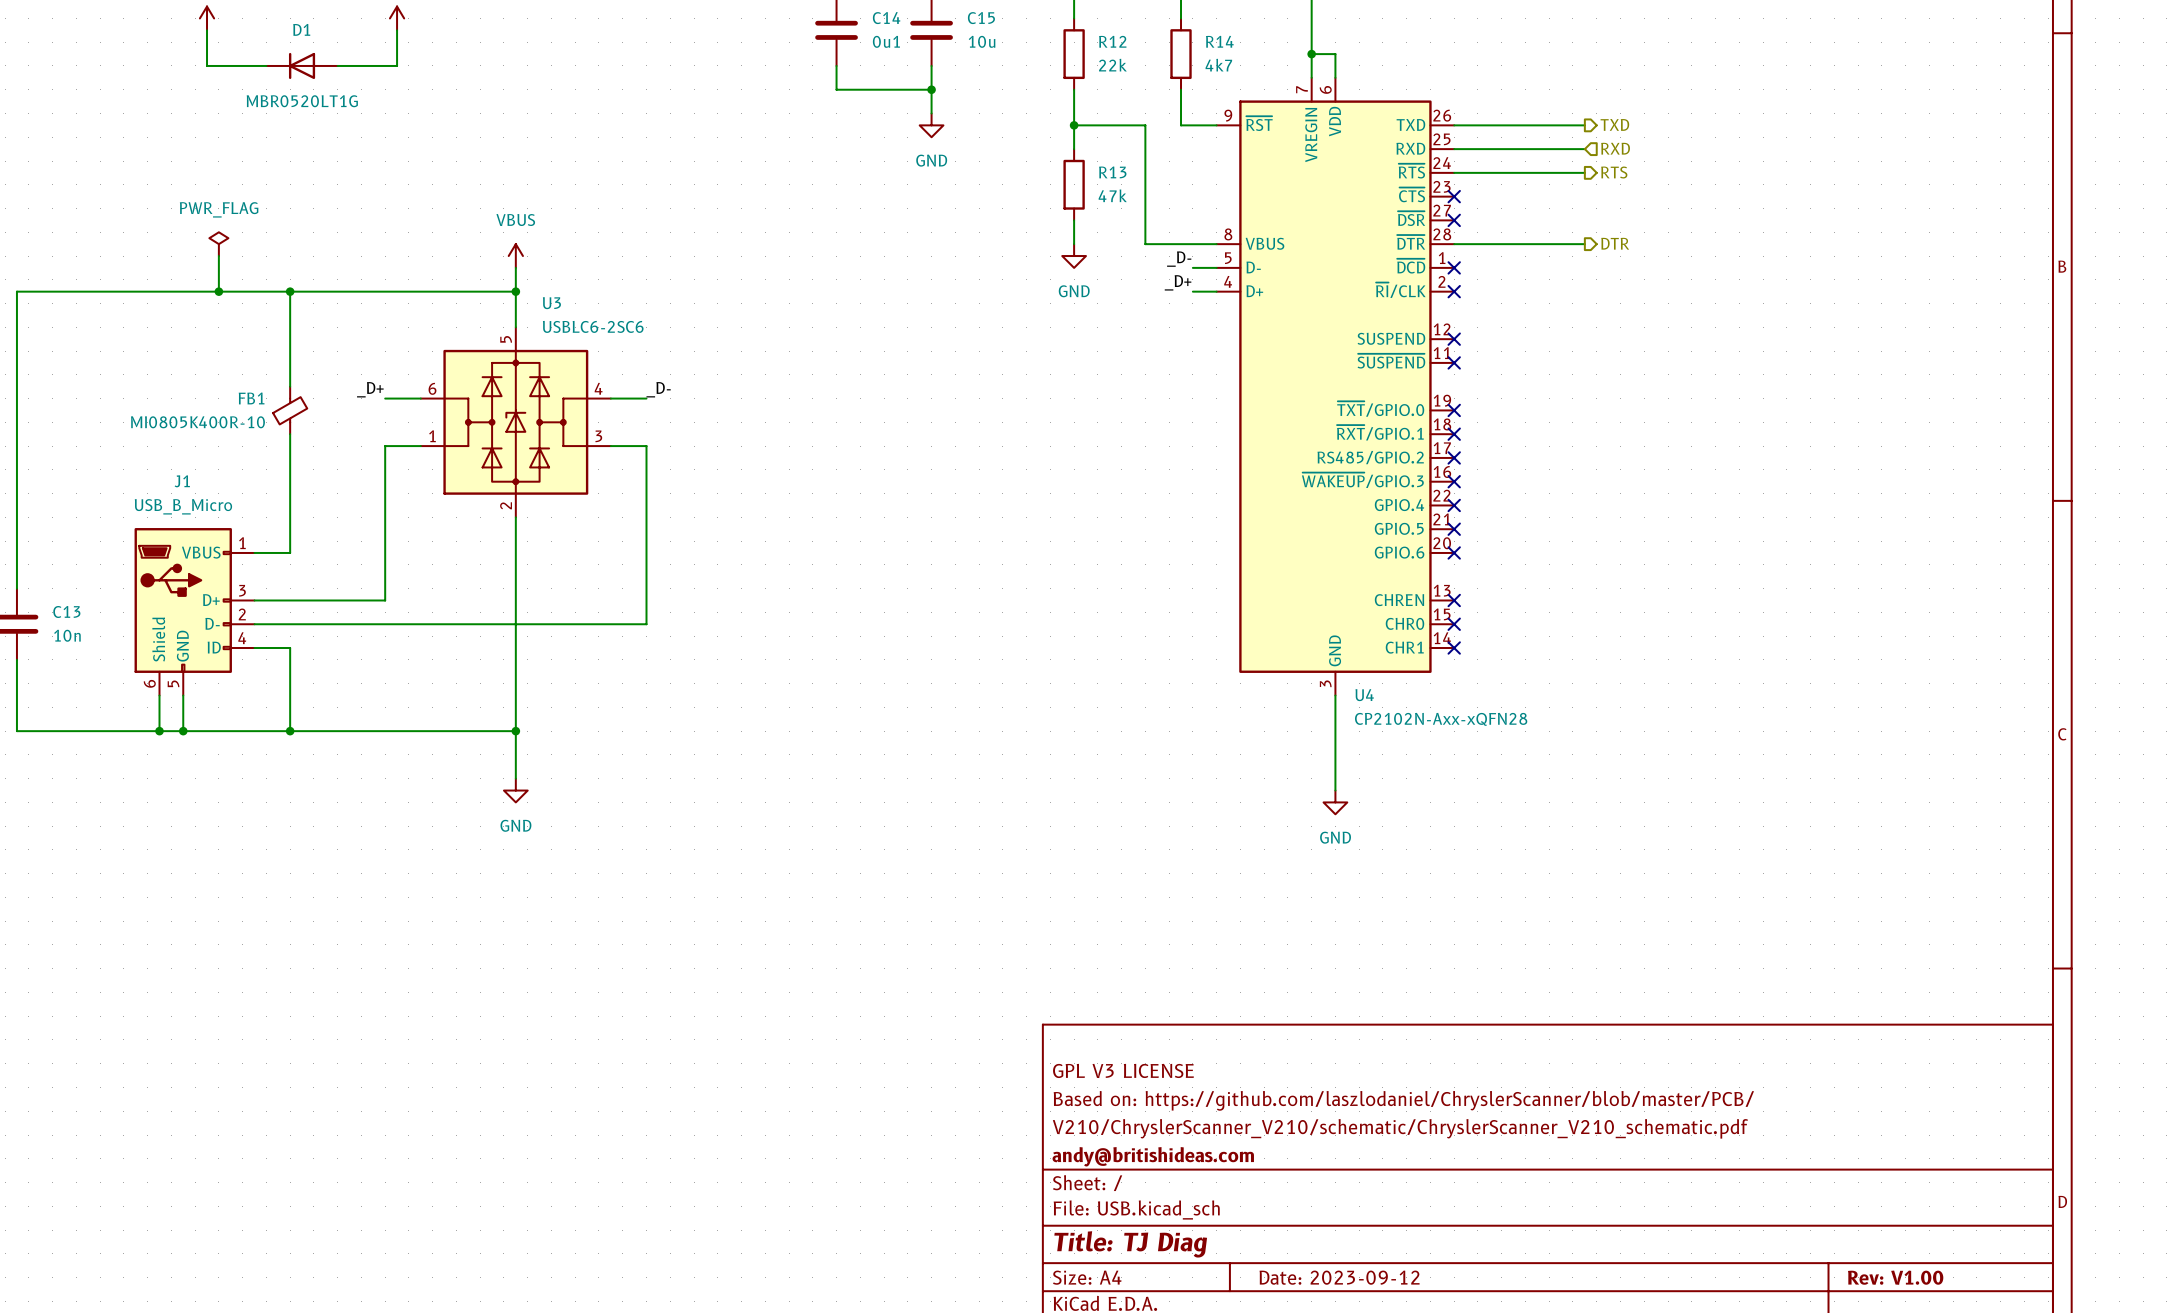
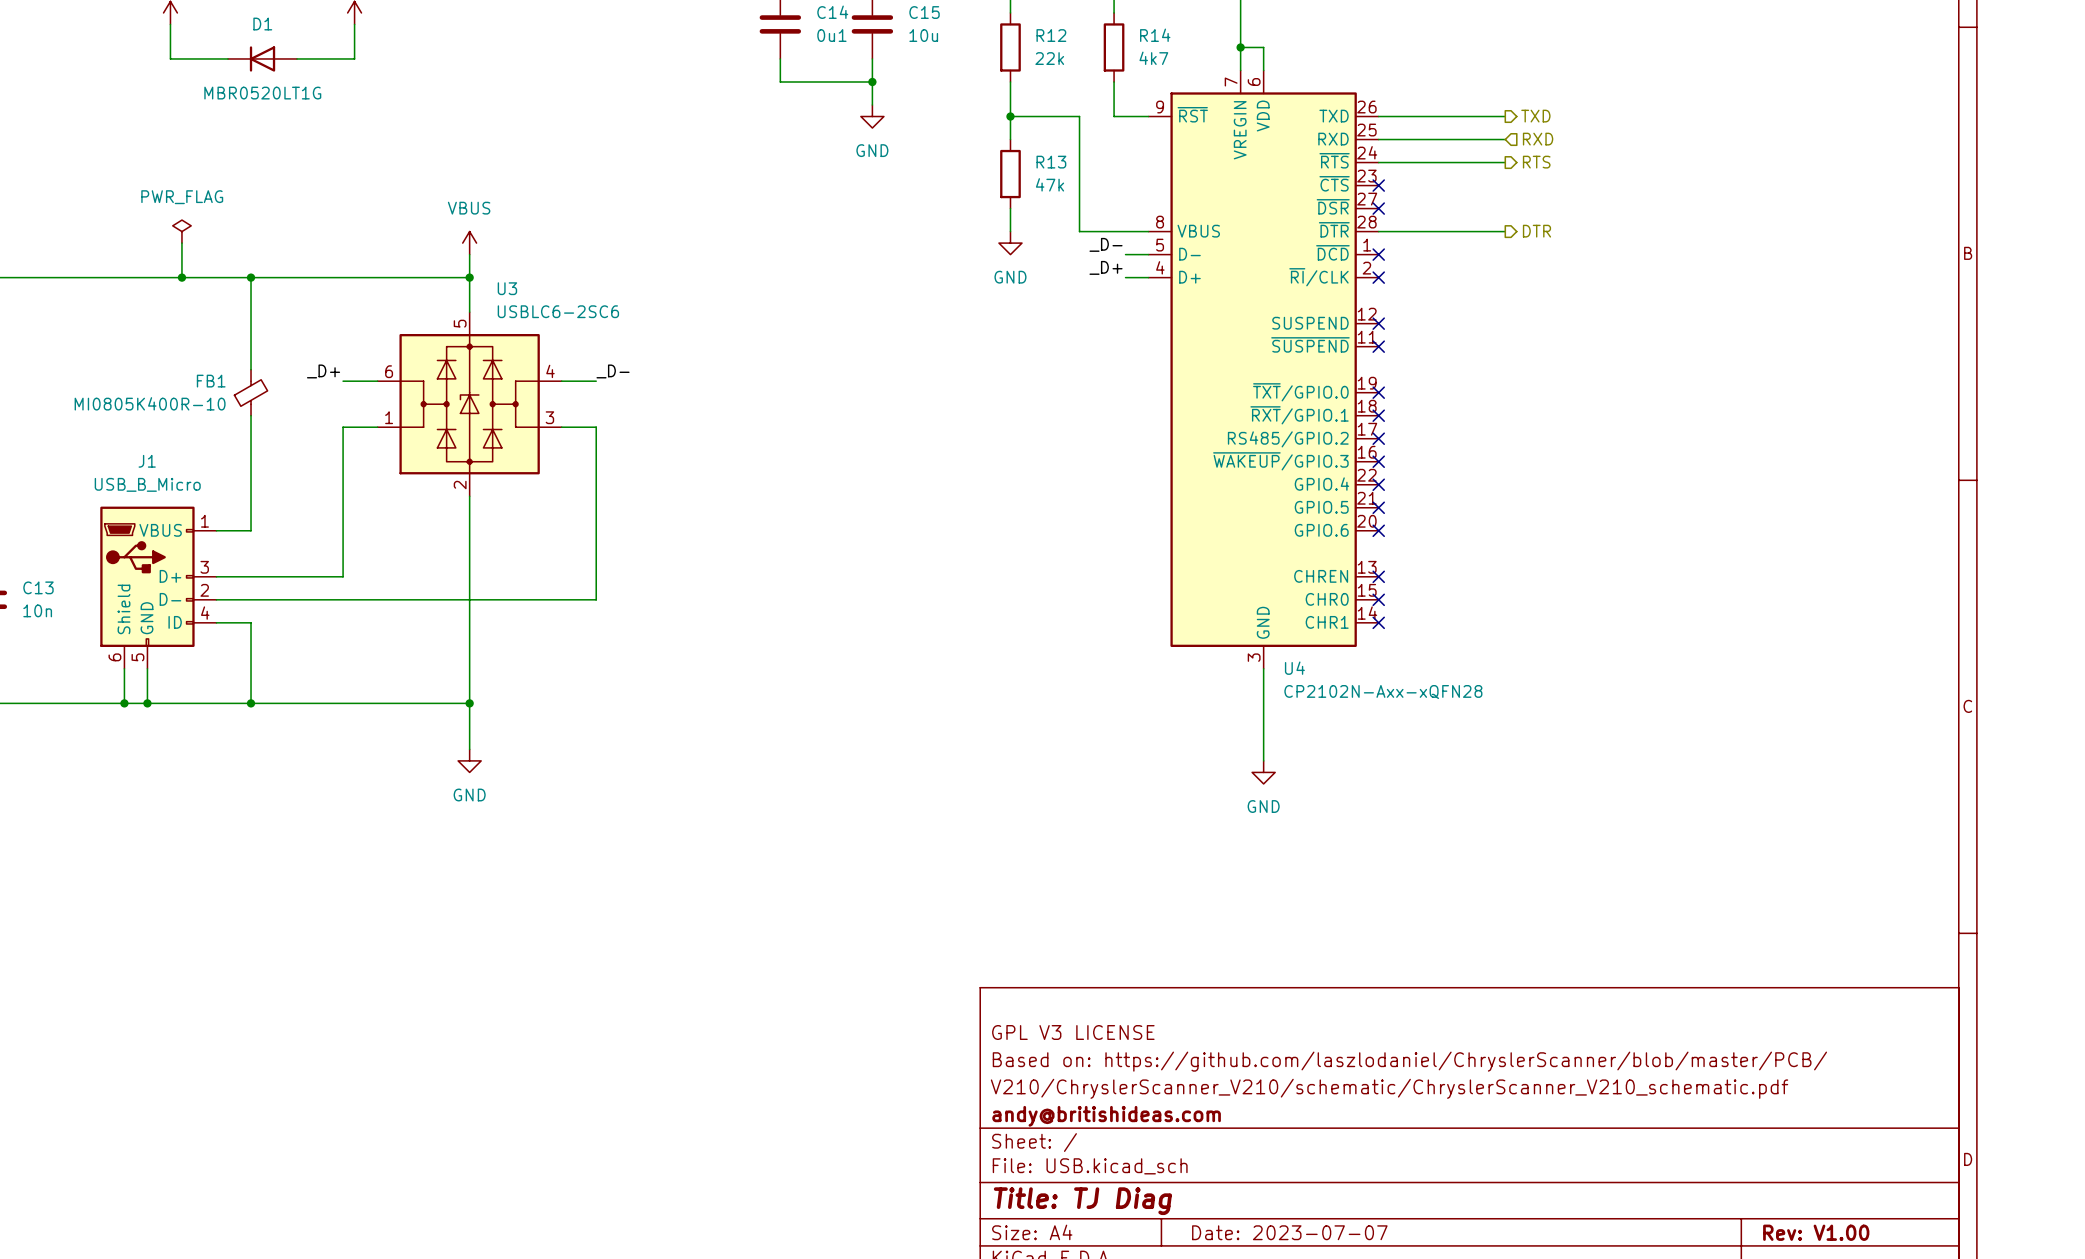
title block: Date: 2023-09-12 (1339, 1277) -> Date: 2023-07-07 (1289, 1232)

